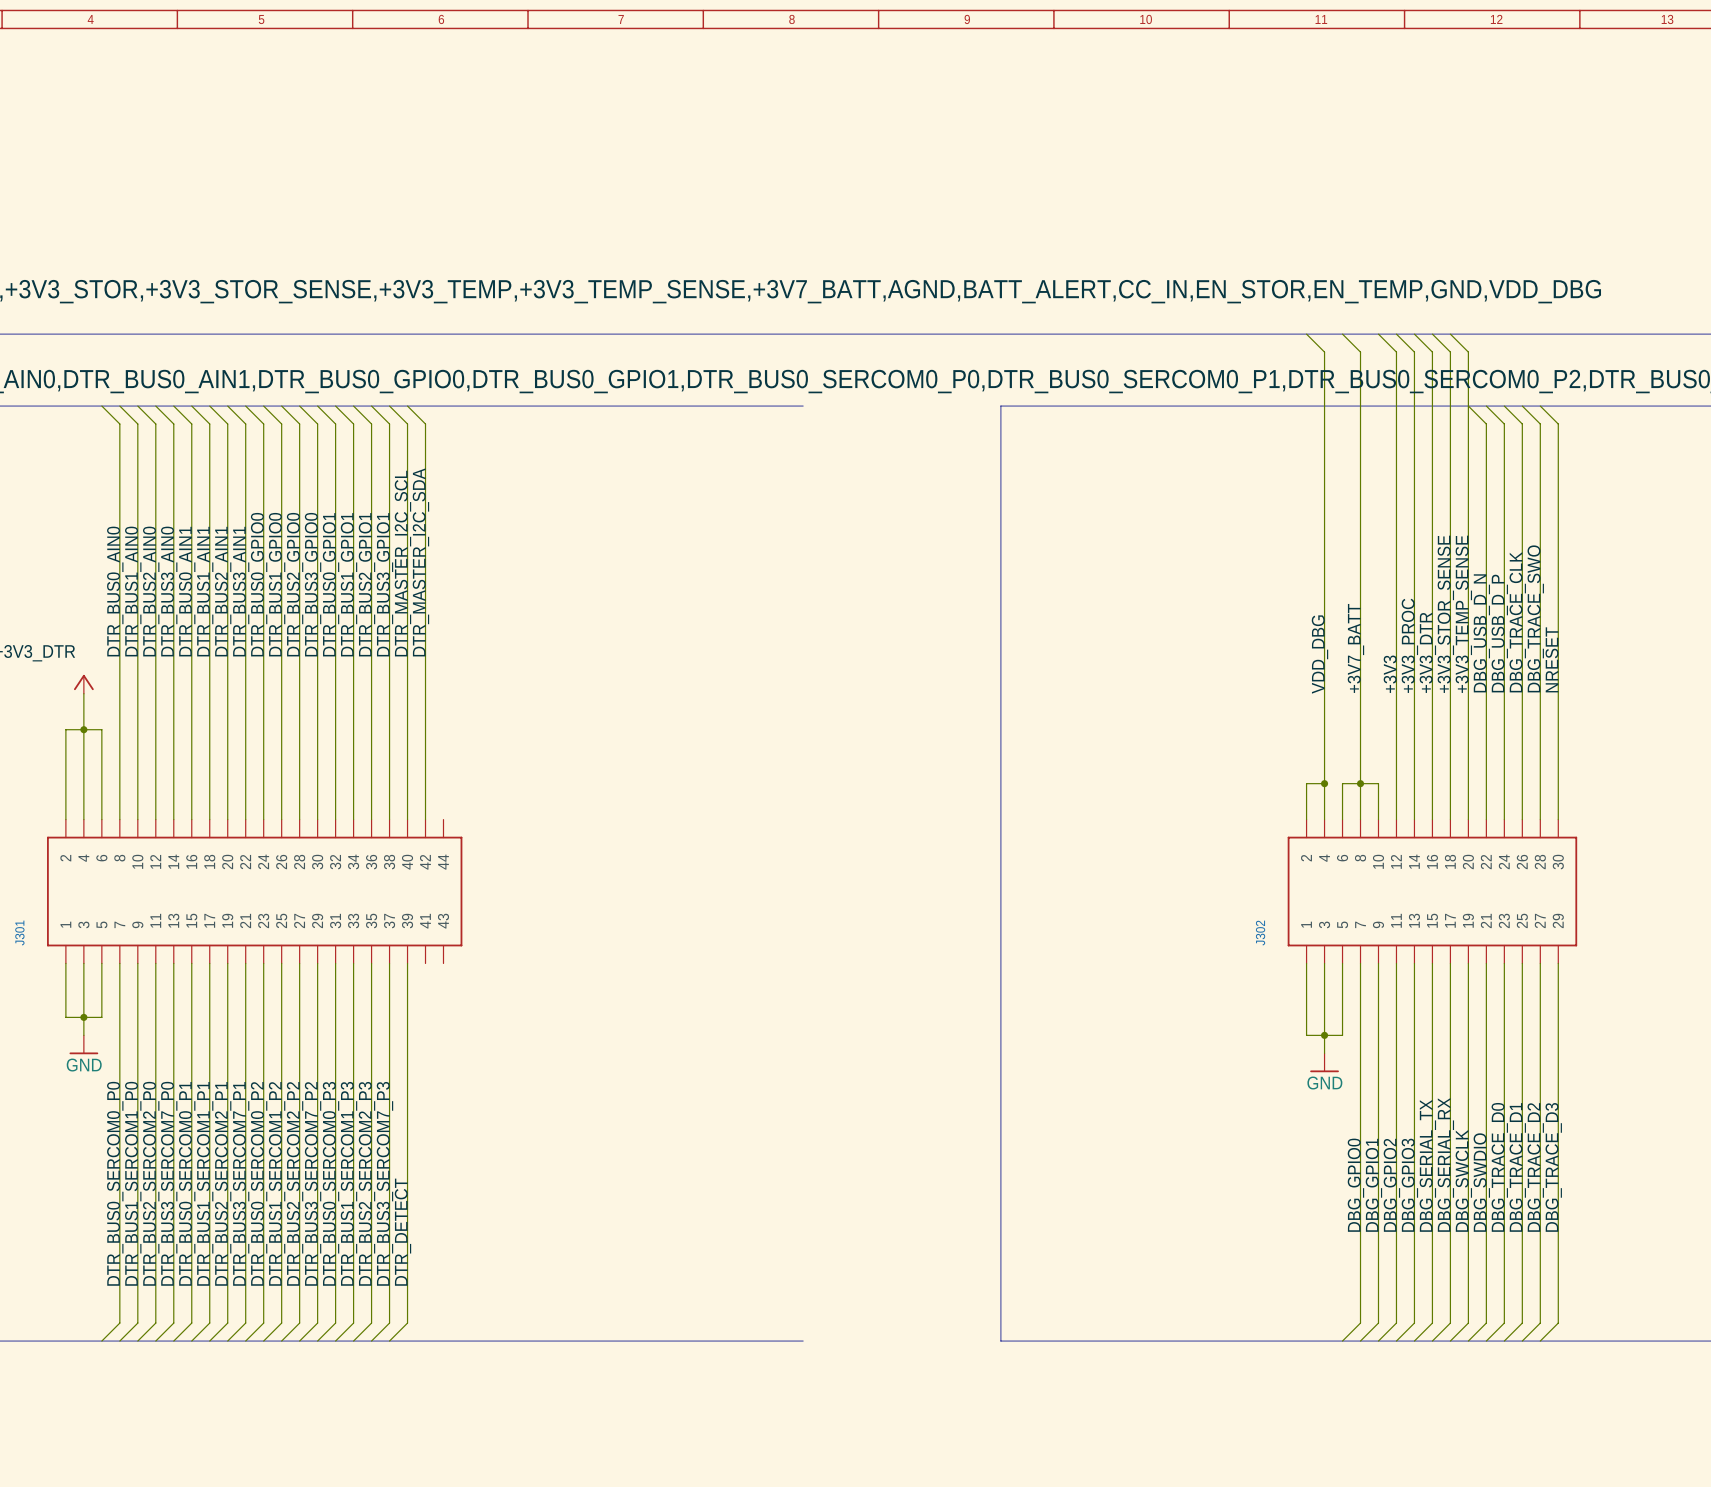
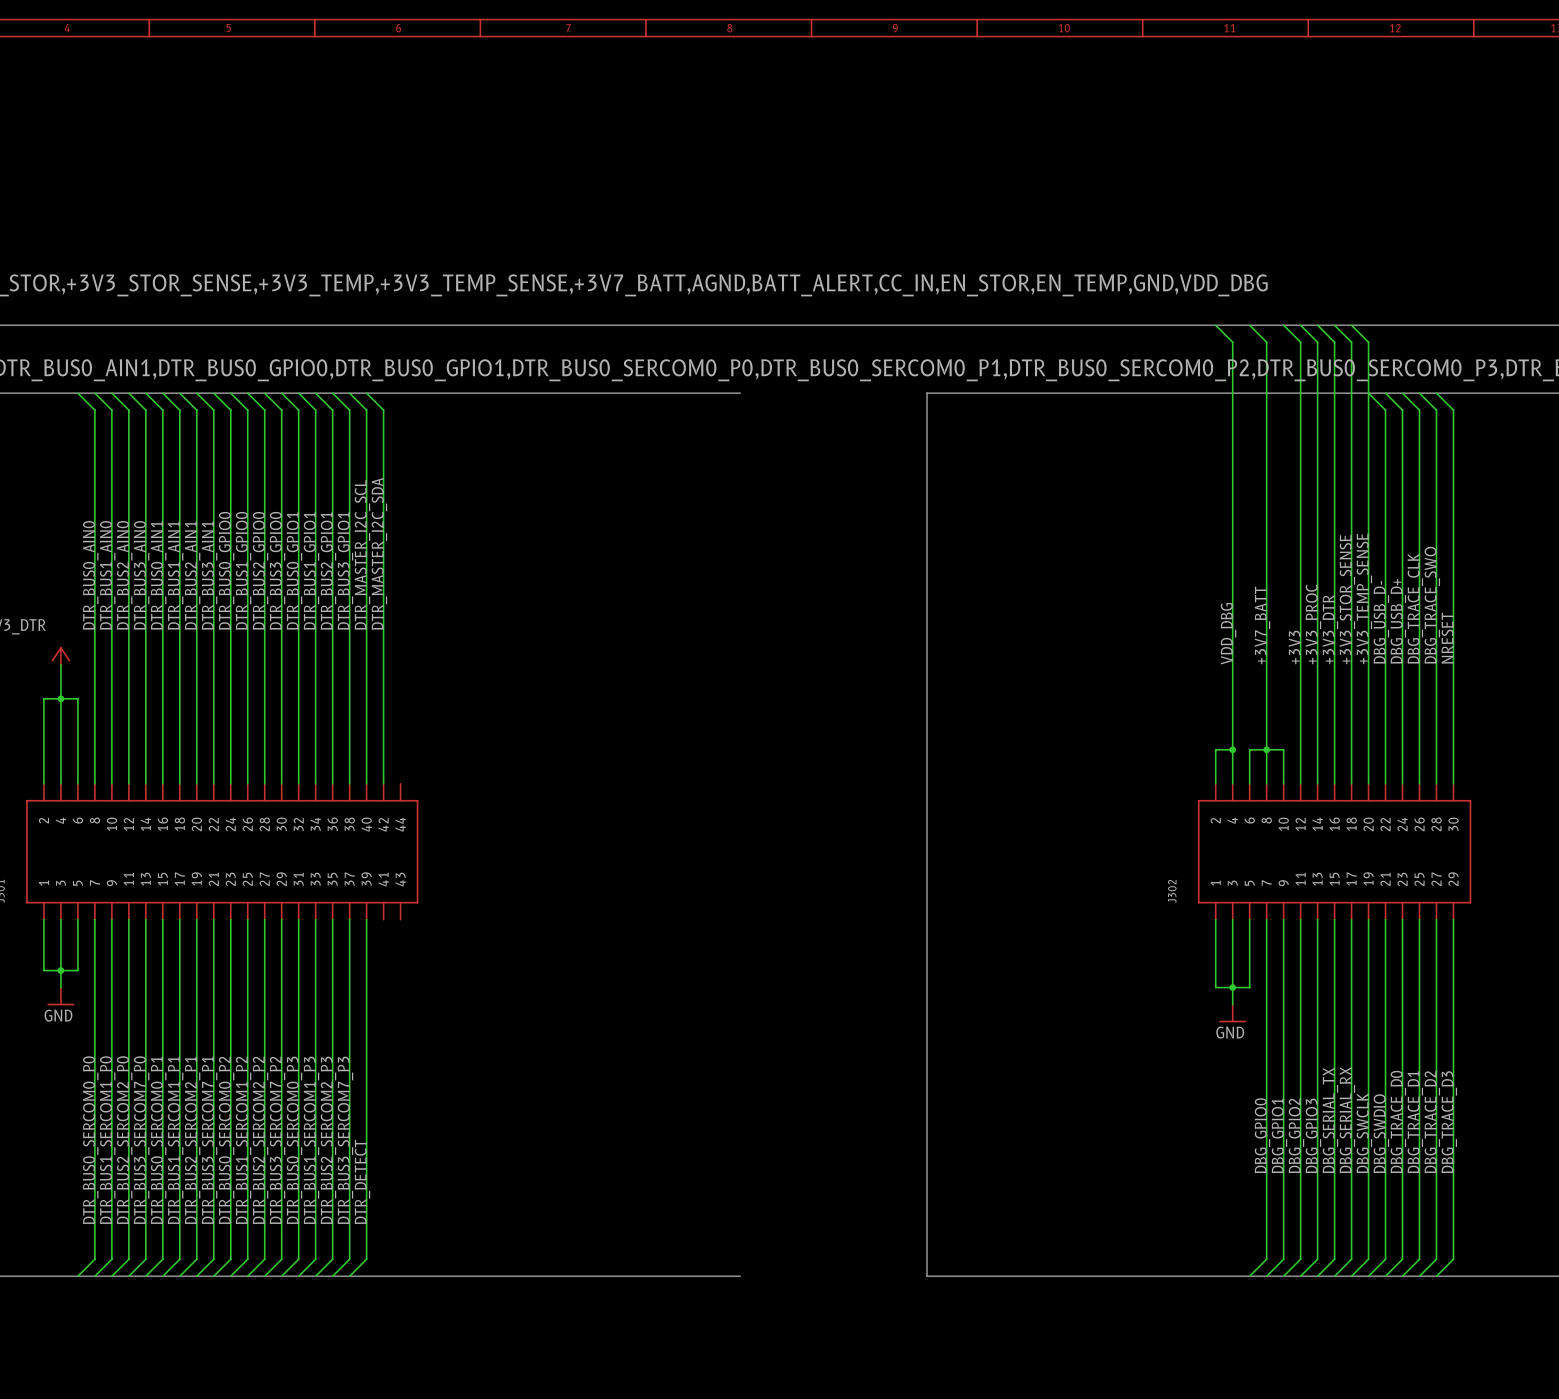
label: DBG_USB_D_N (1481, 633) -> DBG_USB_D- (1381, 622)
label: DBG_USB_D_P (1499, 633) -> DBG_USB_D+ (1398, 621)

